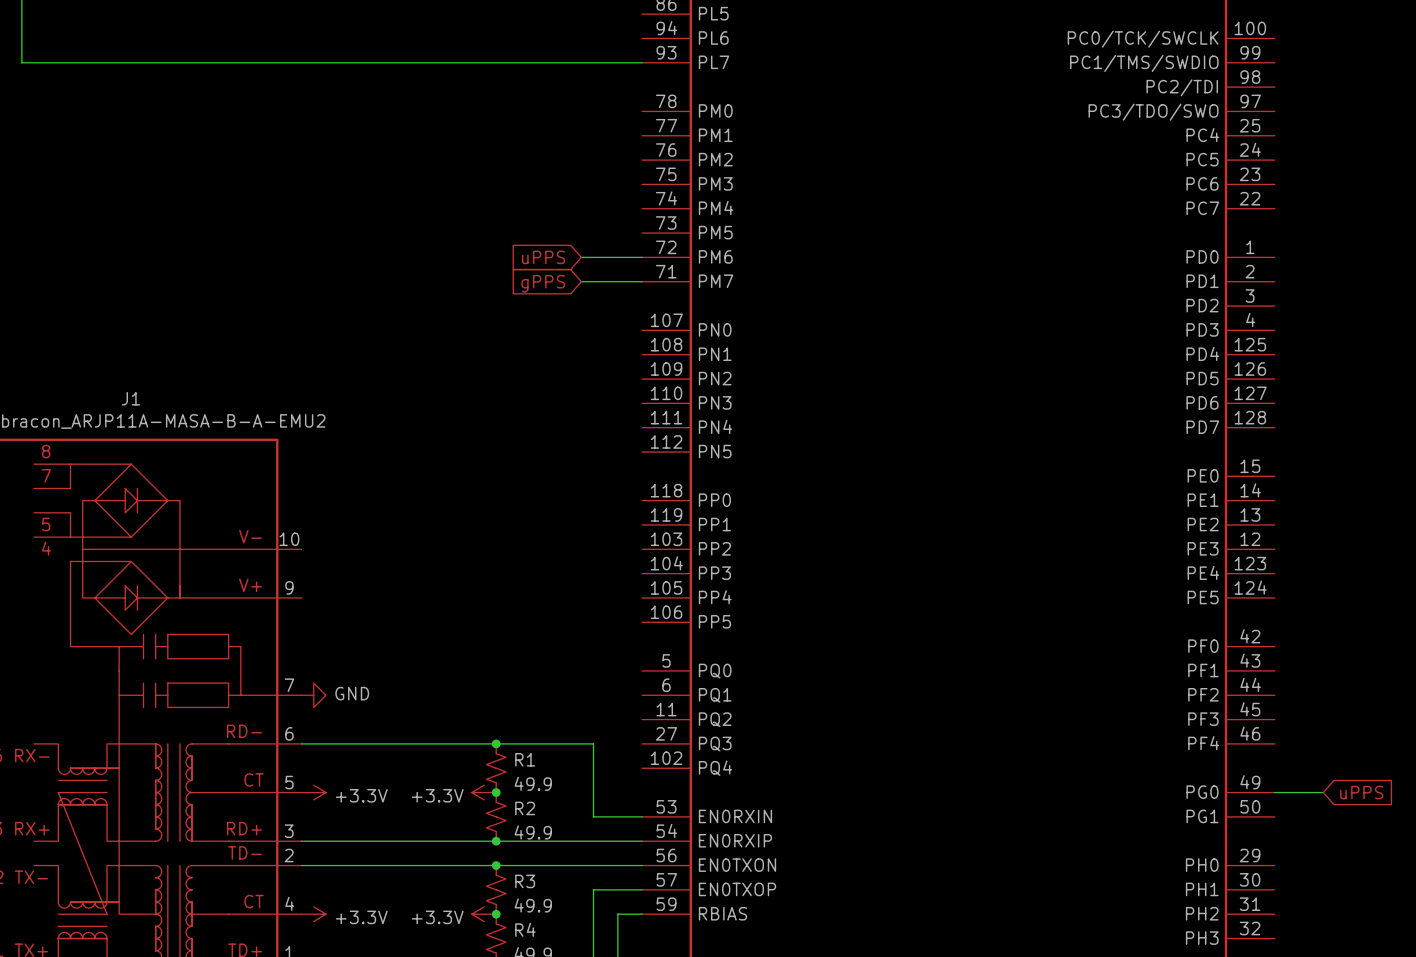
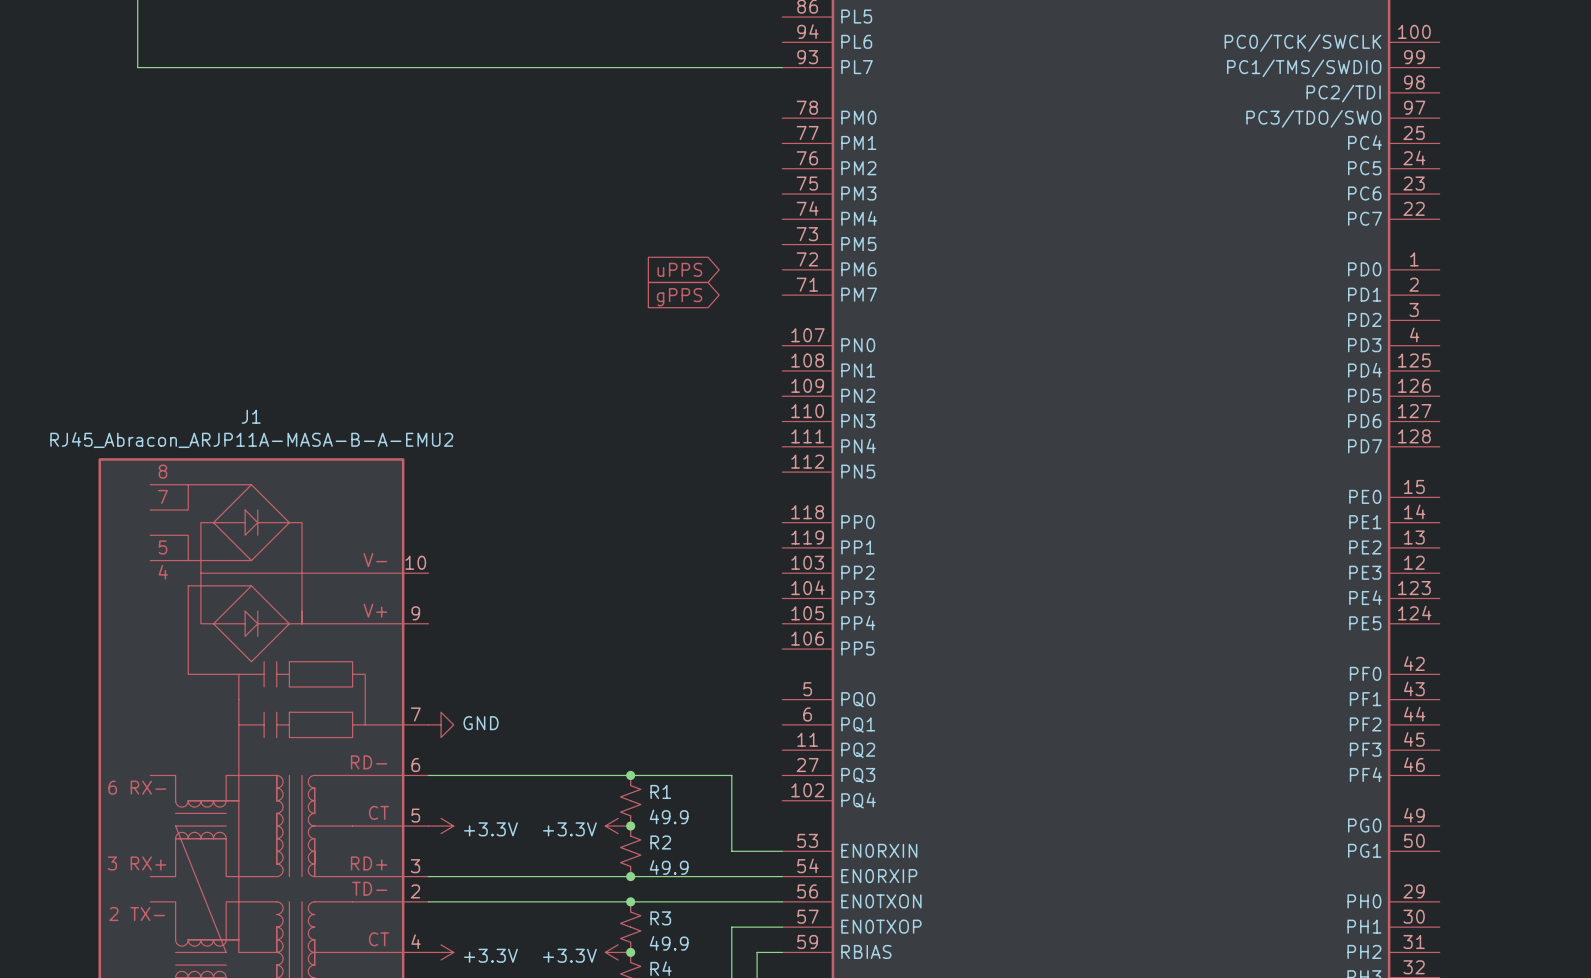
wire: (581, 257) (642, 257) -> none
wire: (581, 281) (642, 281) -> none
wire: (1274, 792) (1323, 792) -> none
global label: uPPS (1361, 792) -> none

